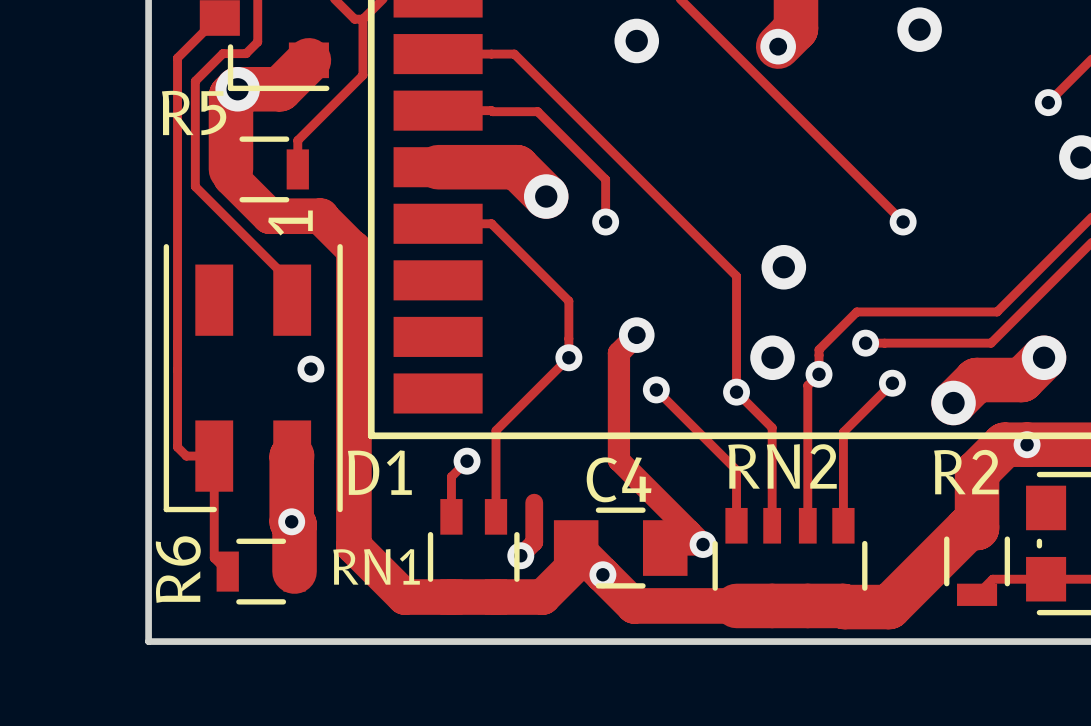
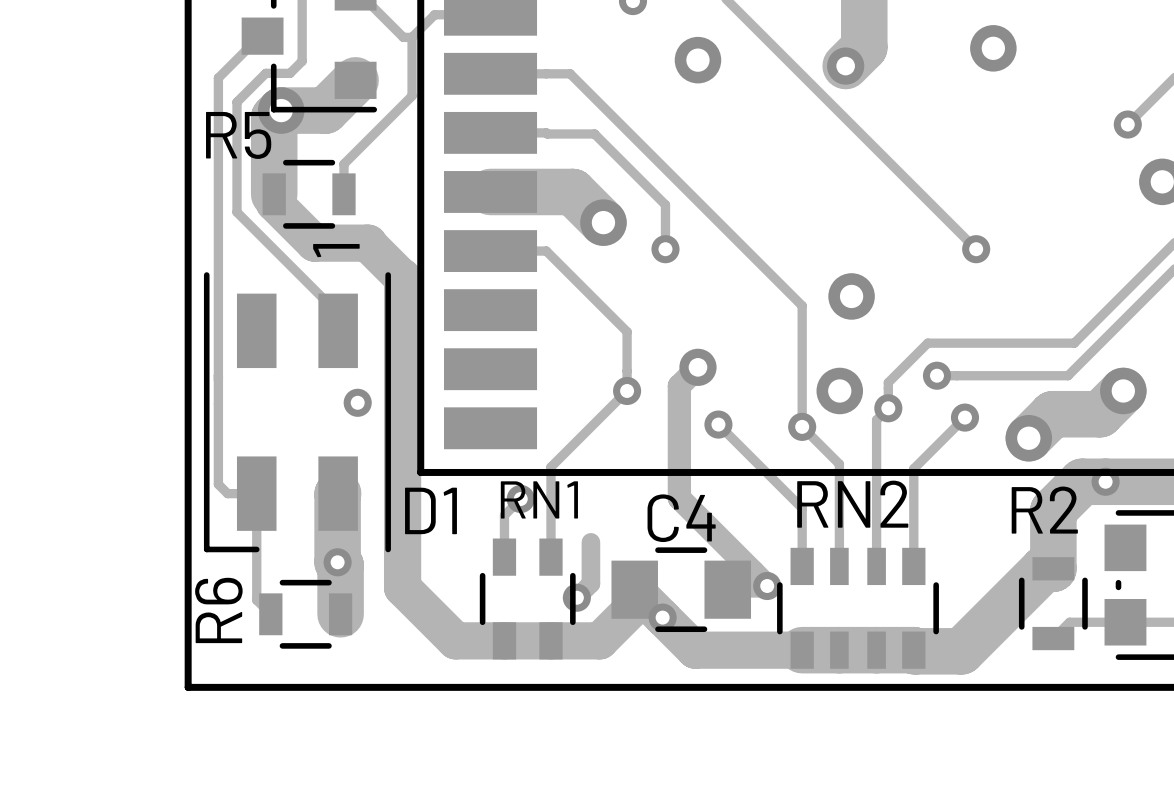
RN1 name position: RN1 (376, 566) -> RN1 (539, 499)

